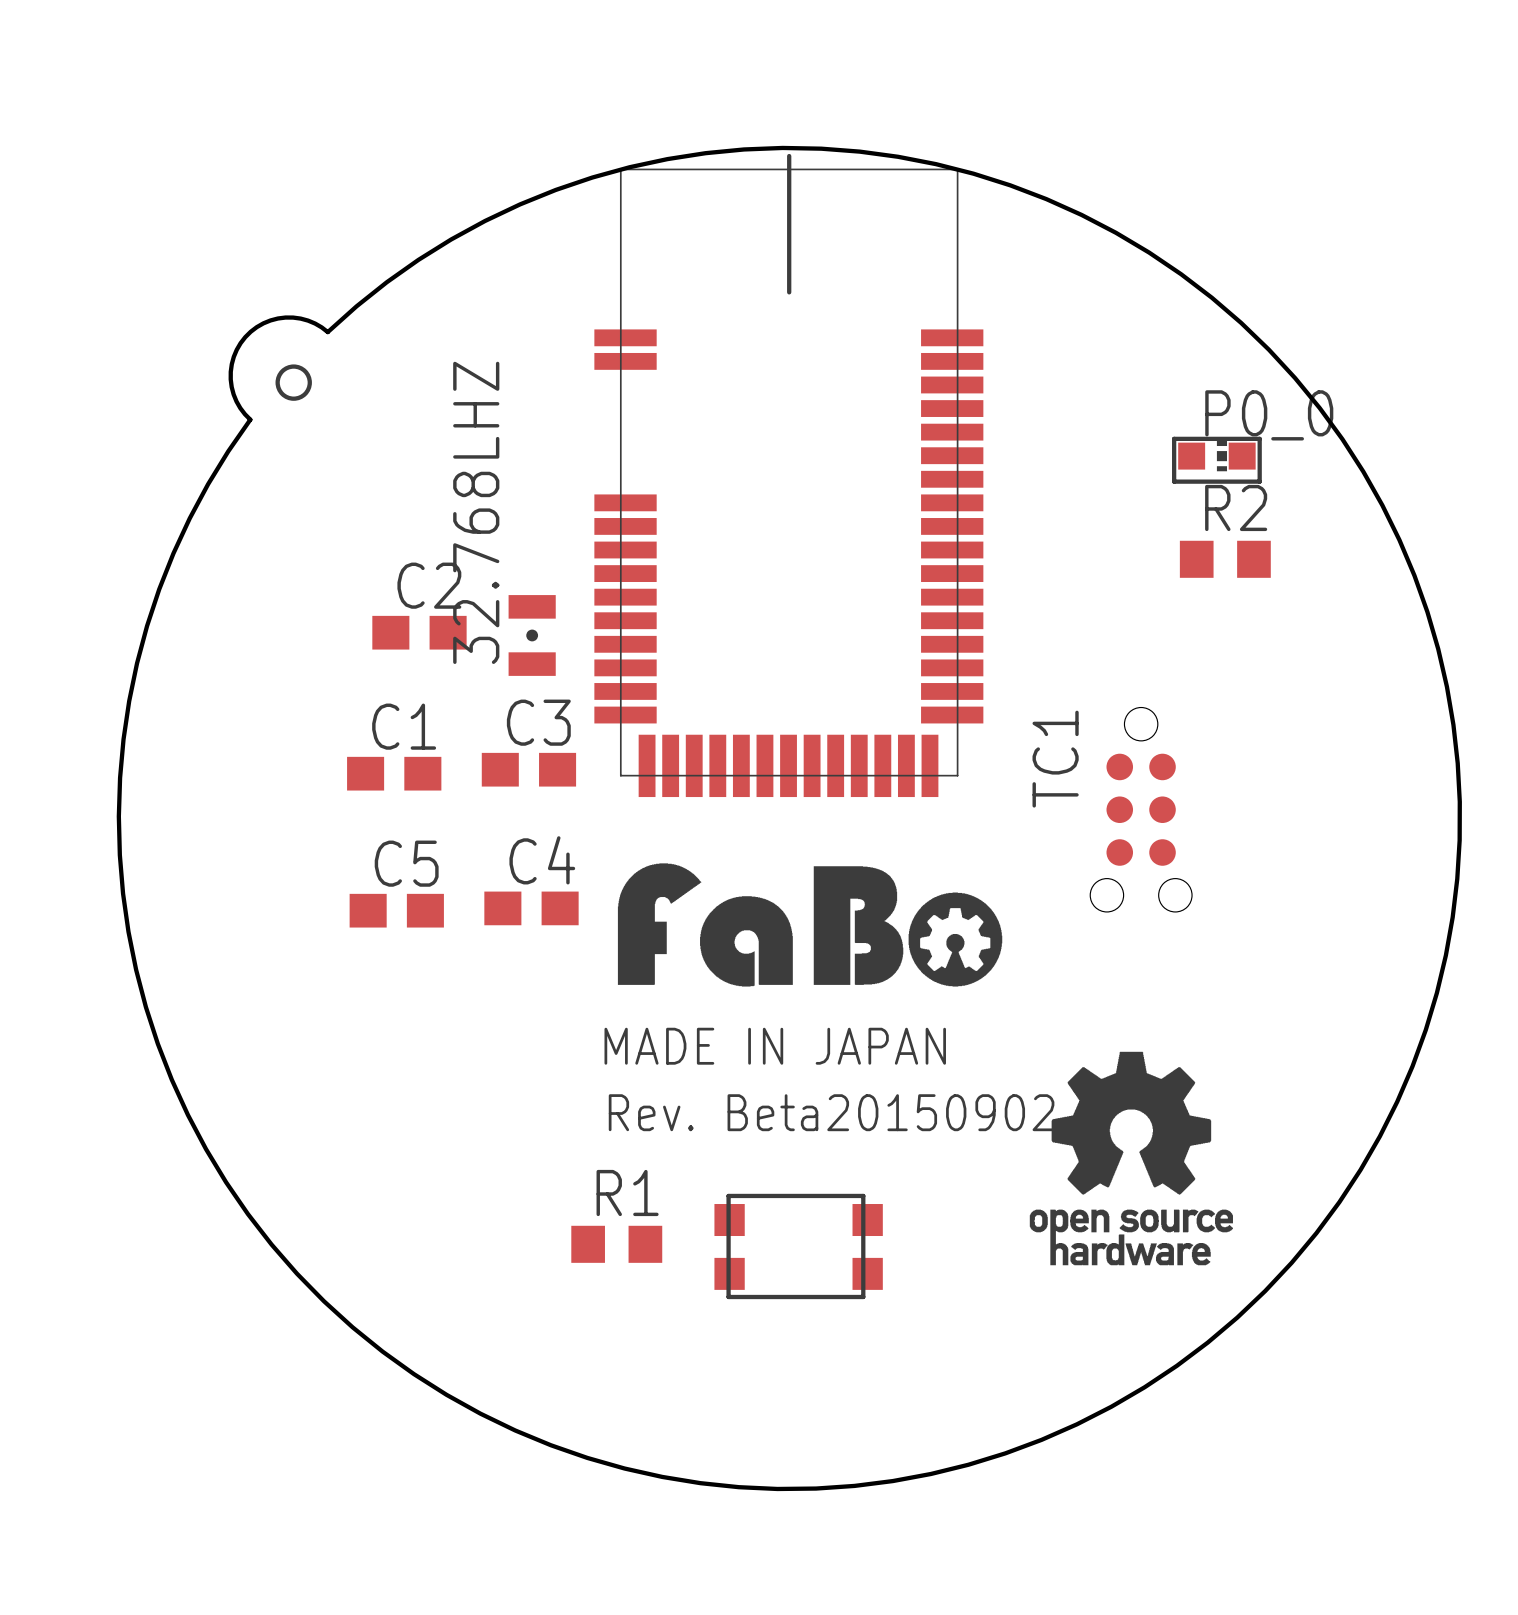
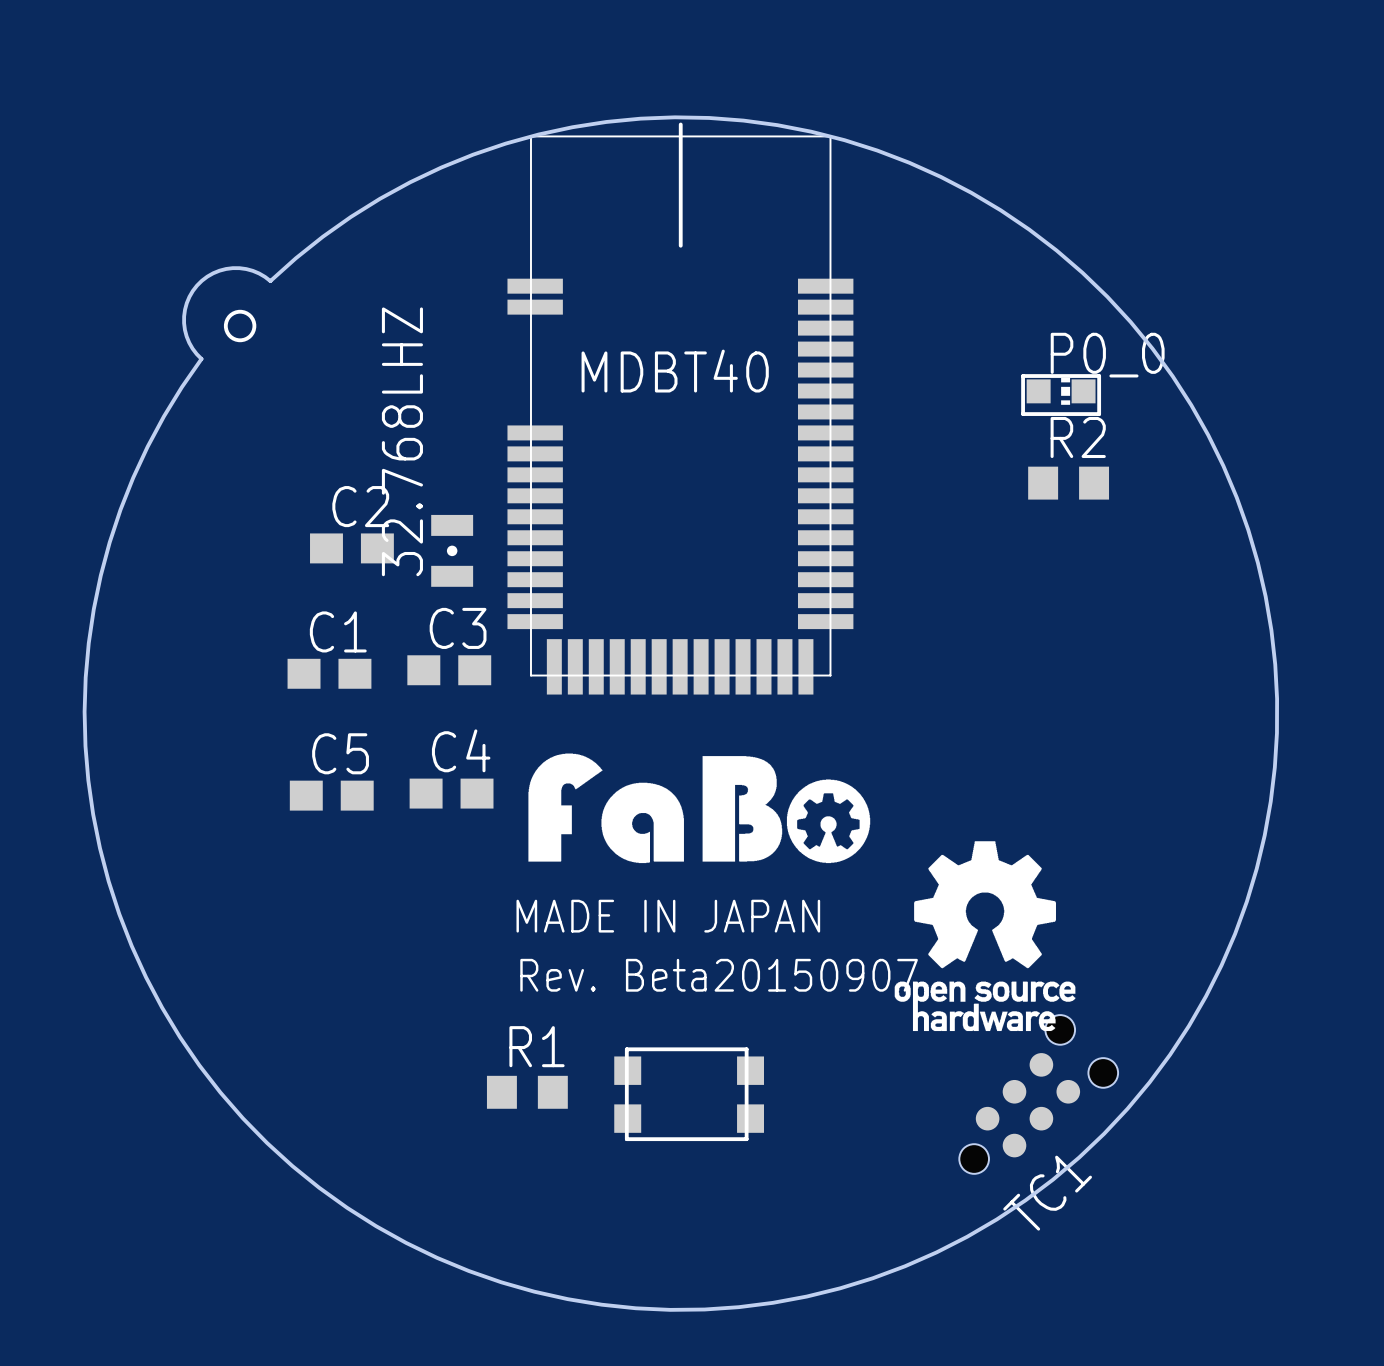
part text: none -> MDBT40 (675, 371)
TC1 rotation: 0° (1141, 809) -> 135° counterclockwise (1038, 1094)
TC1 position: (1141, 809) -> (1038, 1094)
text: Rev. Beta20150902 (831, 1112) -> Rev. Beta20150907 (719, 975)
drawing position: (1131, 1158) -> (985, 936)

